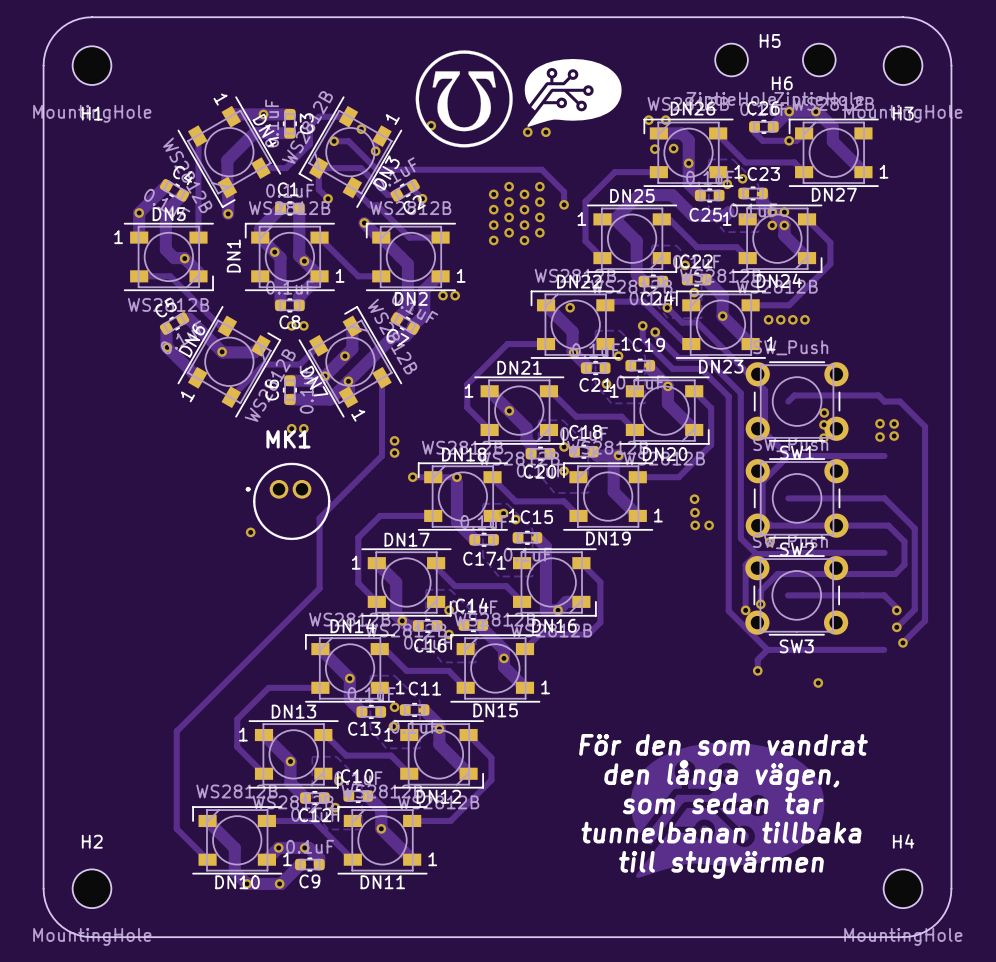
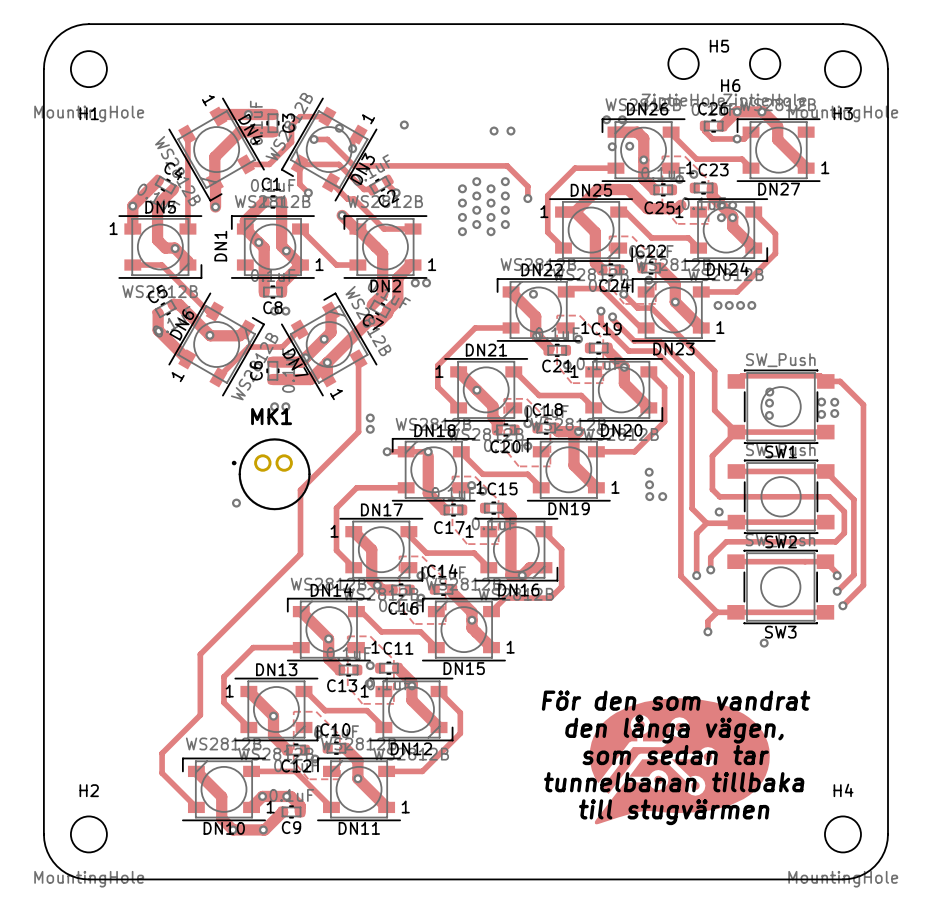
drawing: [415, 50, 622, 148] -> none
SW1 footprint: [745, 361, 849, 442] -> [727, 369, 835, 444]
SW2 footprint: [745, 458, 849, 539] -> [727, 459, 835, 534]
SW3 footprint: [745, 555, 849, 636] -> [727, 549, 835, 625]
track: (319, 587) (176, 731) (176, 828) -> (300, 554) (200, 654) (200, 715) (162, 753) (162, 773) (167, 778)

